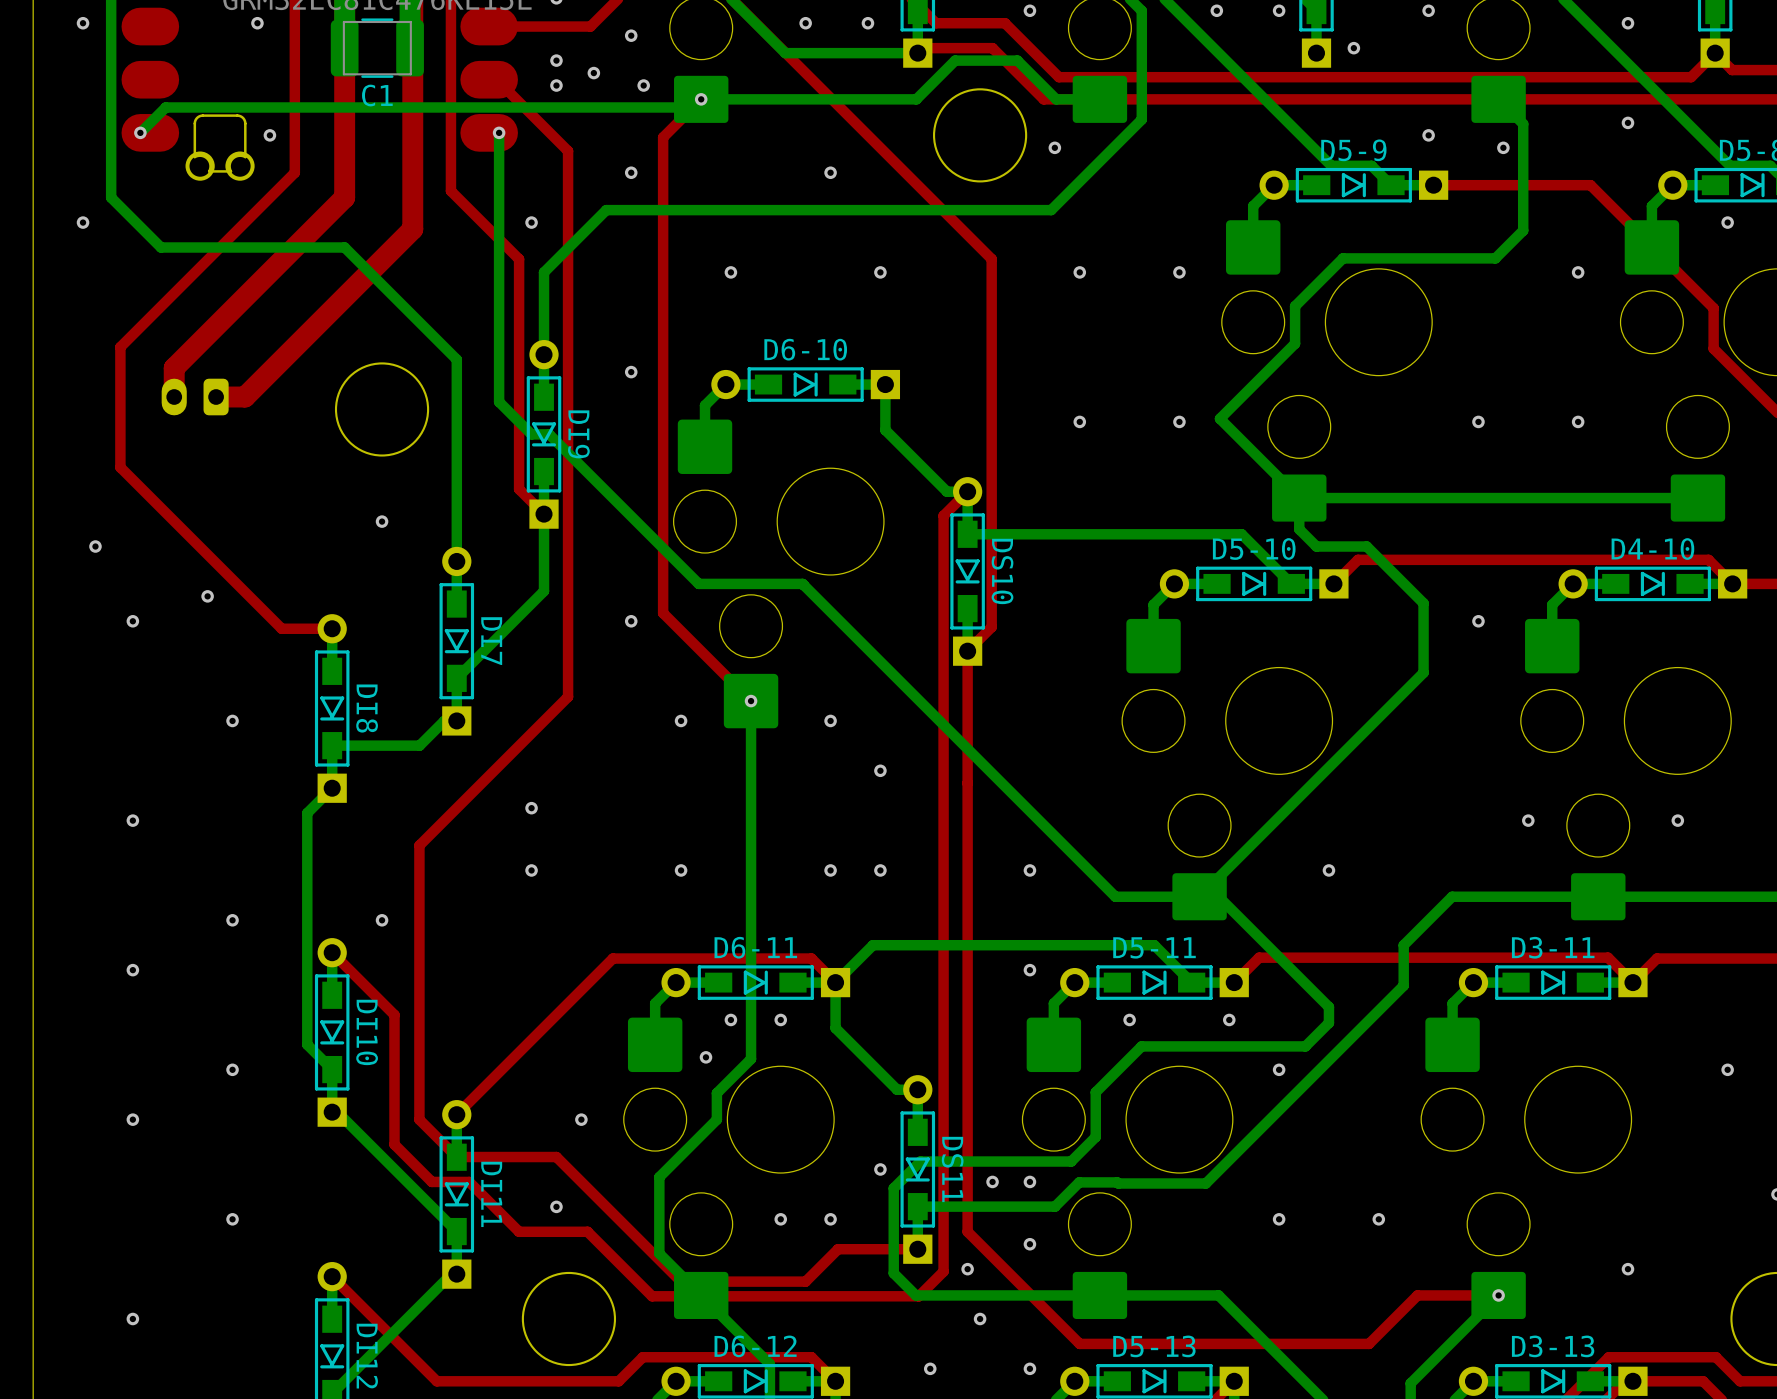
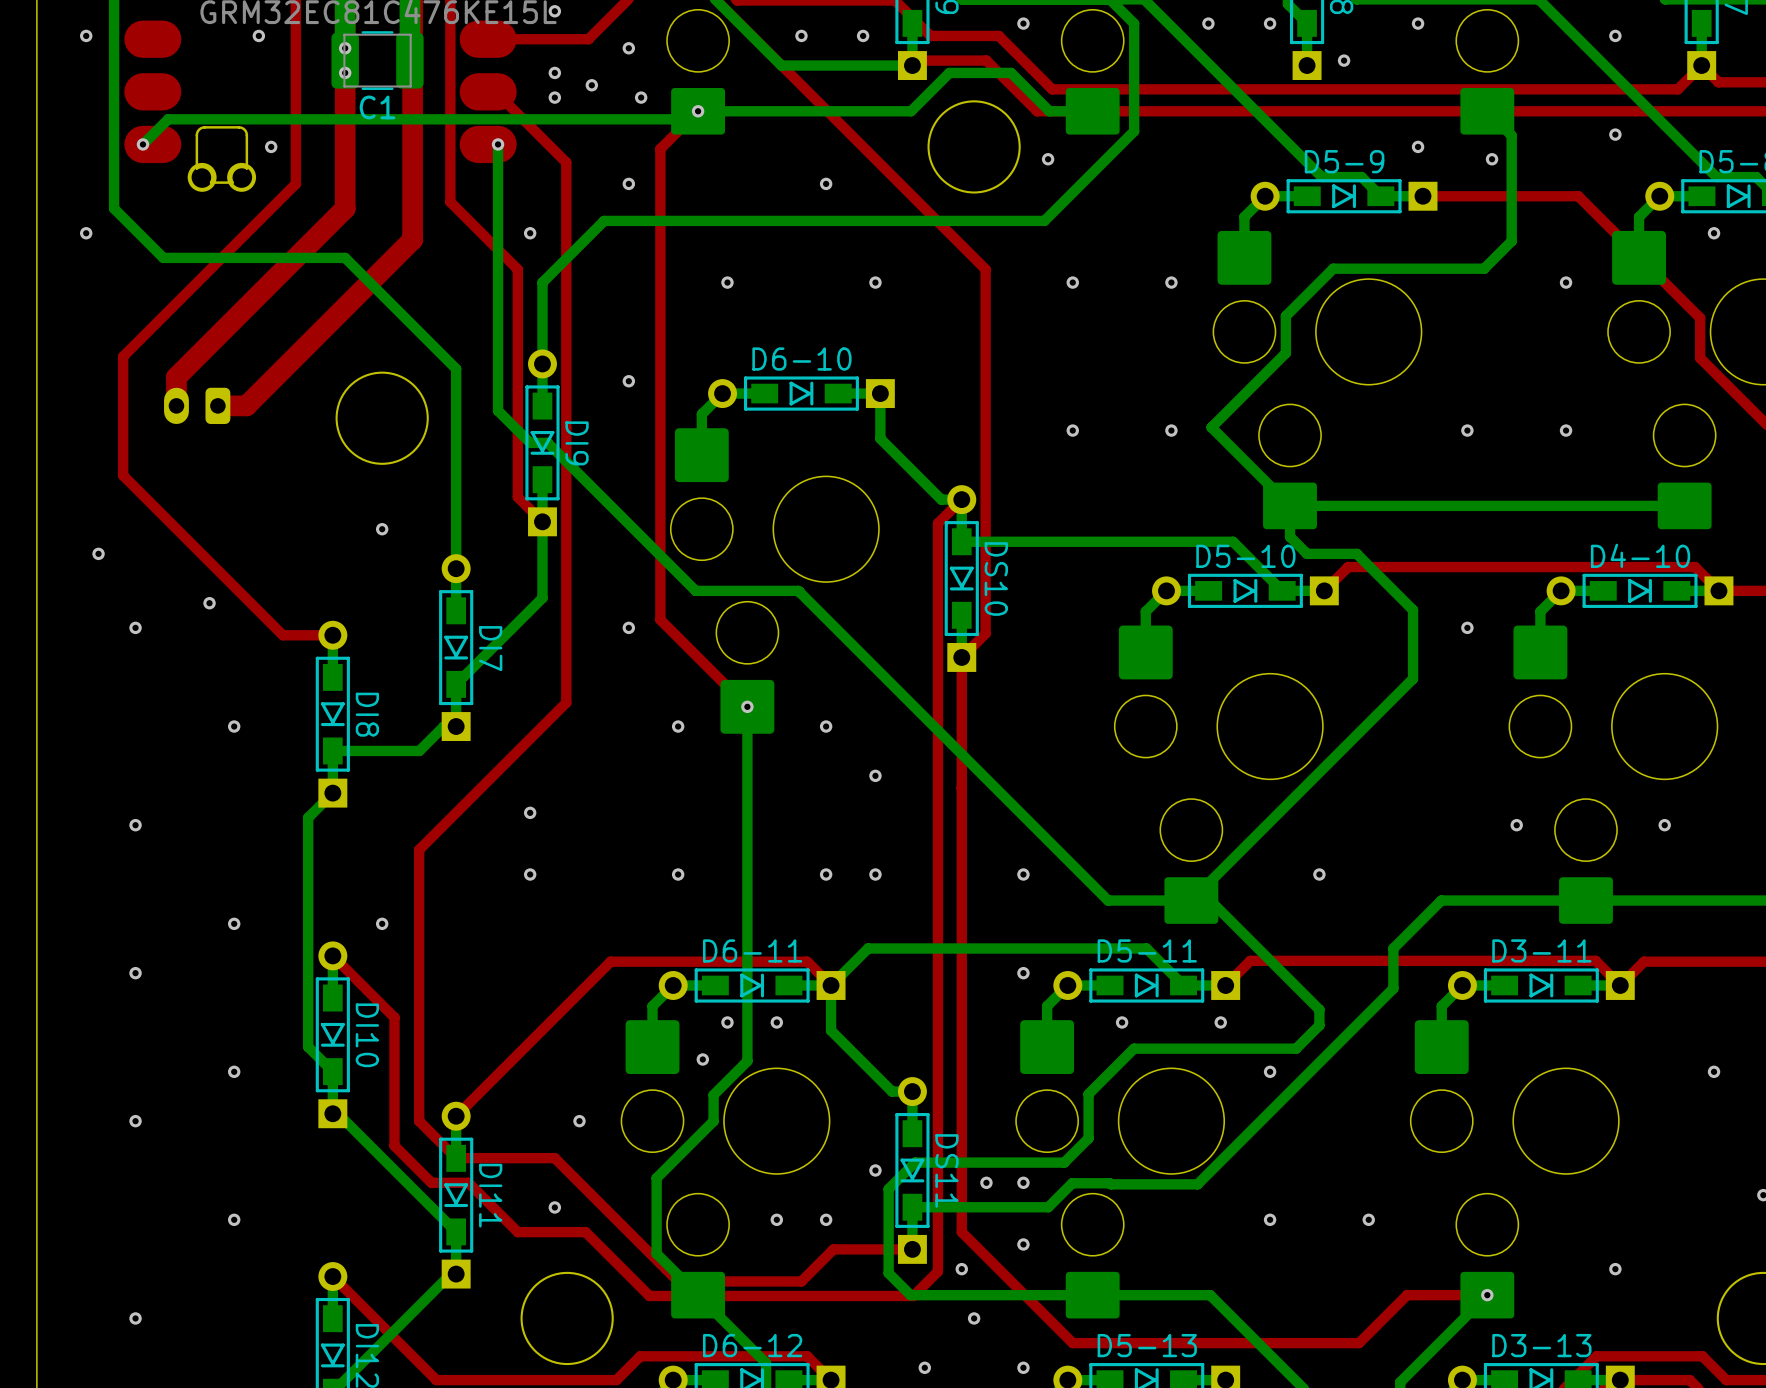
via: none -> (345, 48)
via: none -> (345, 72)

